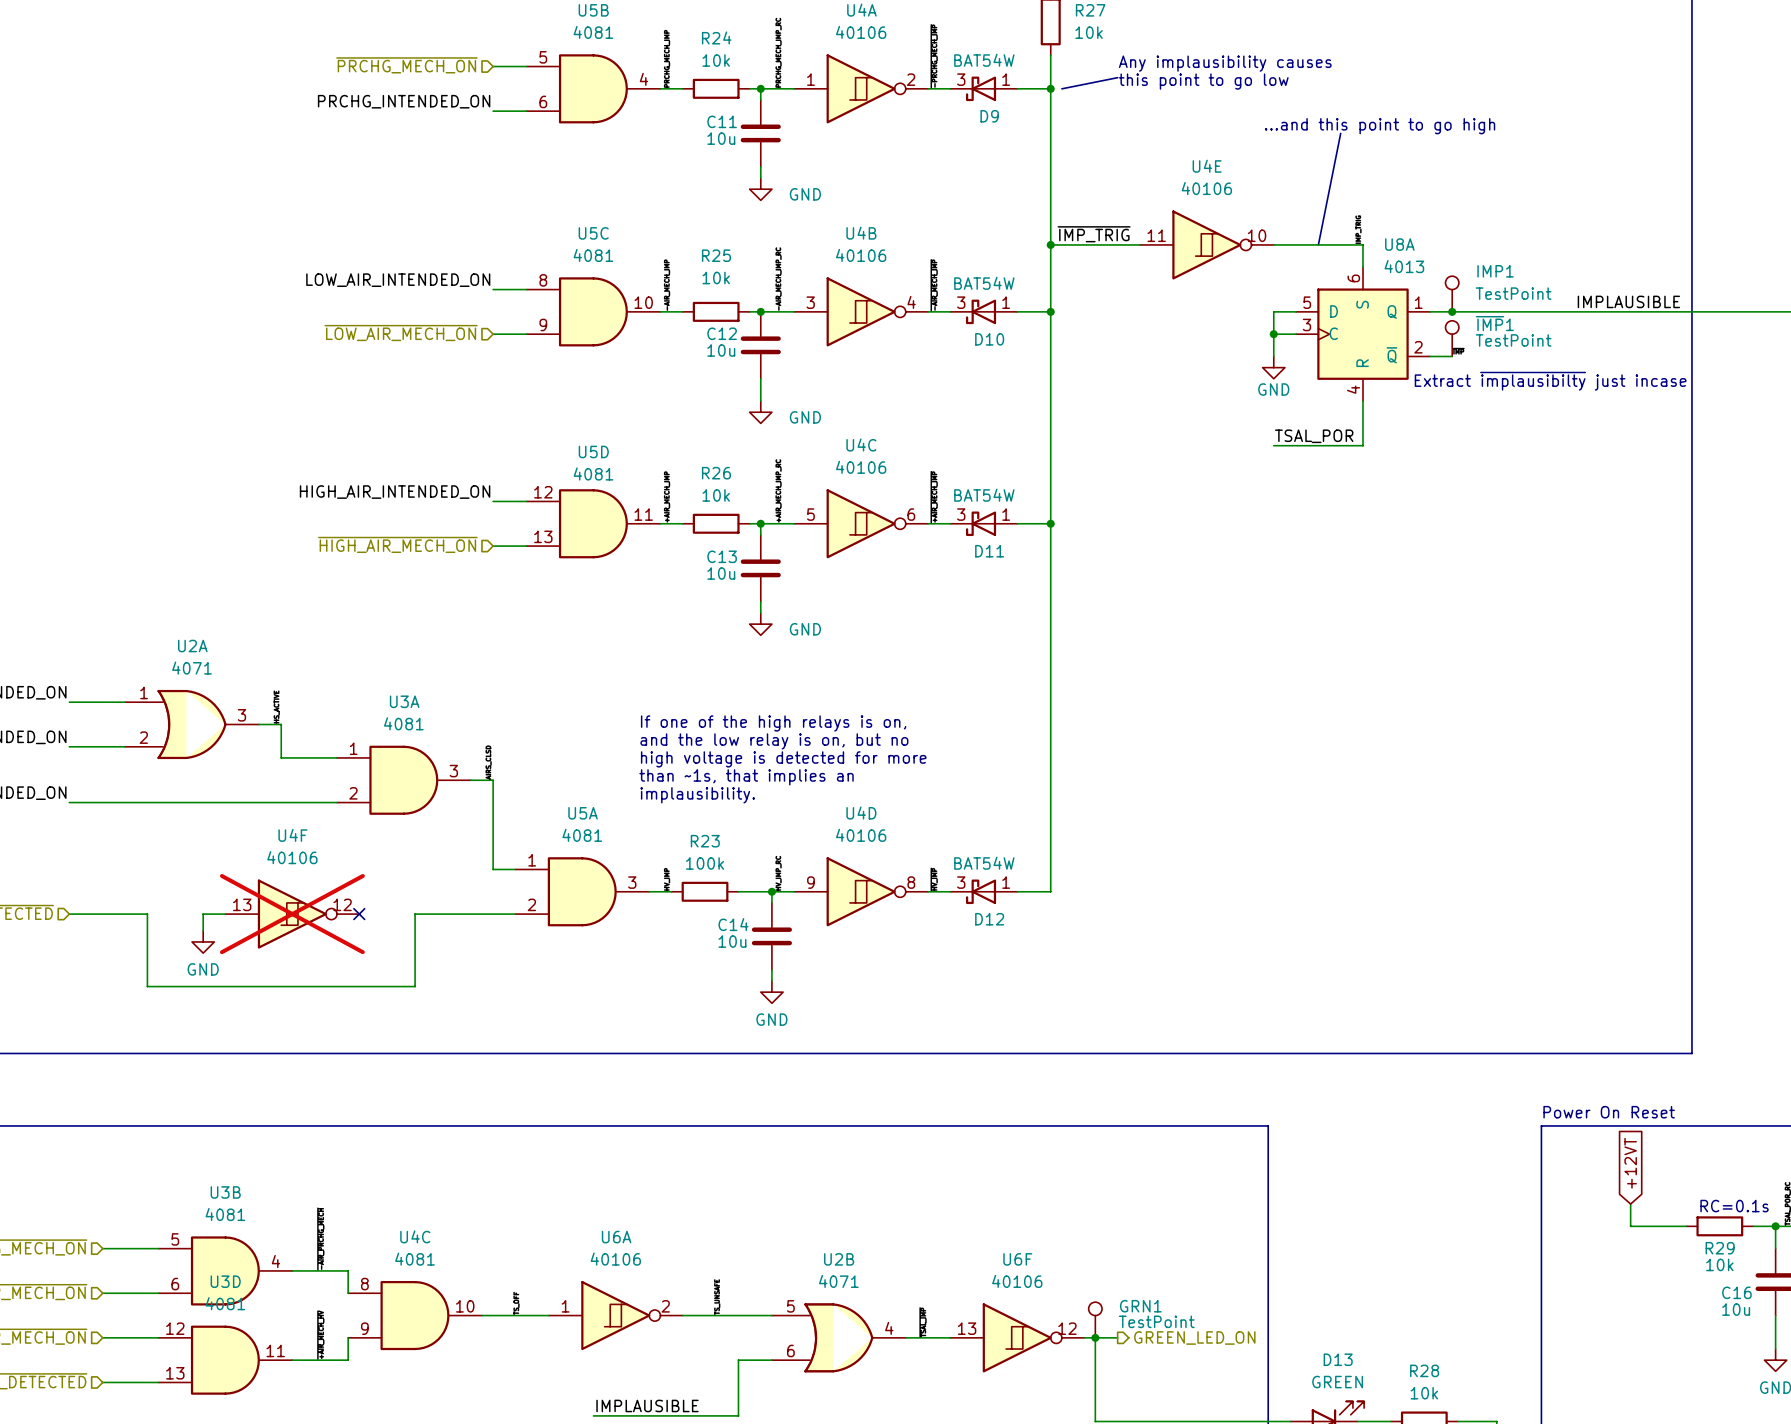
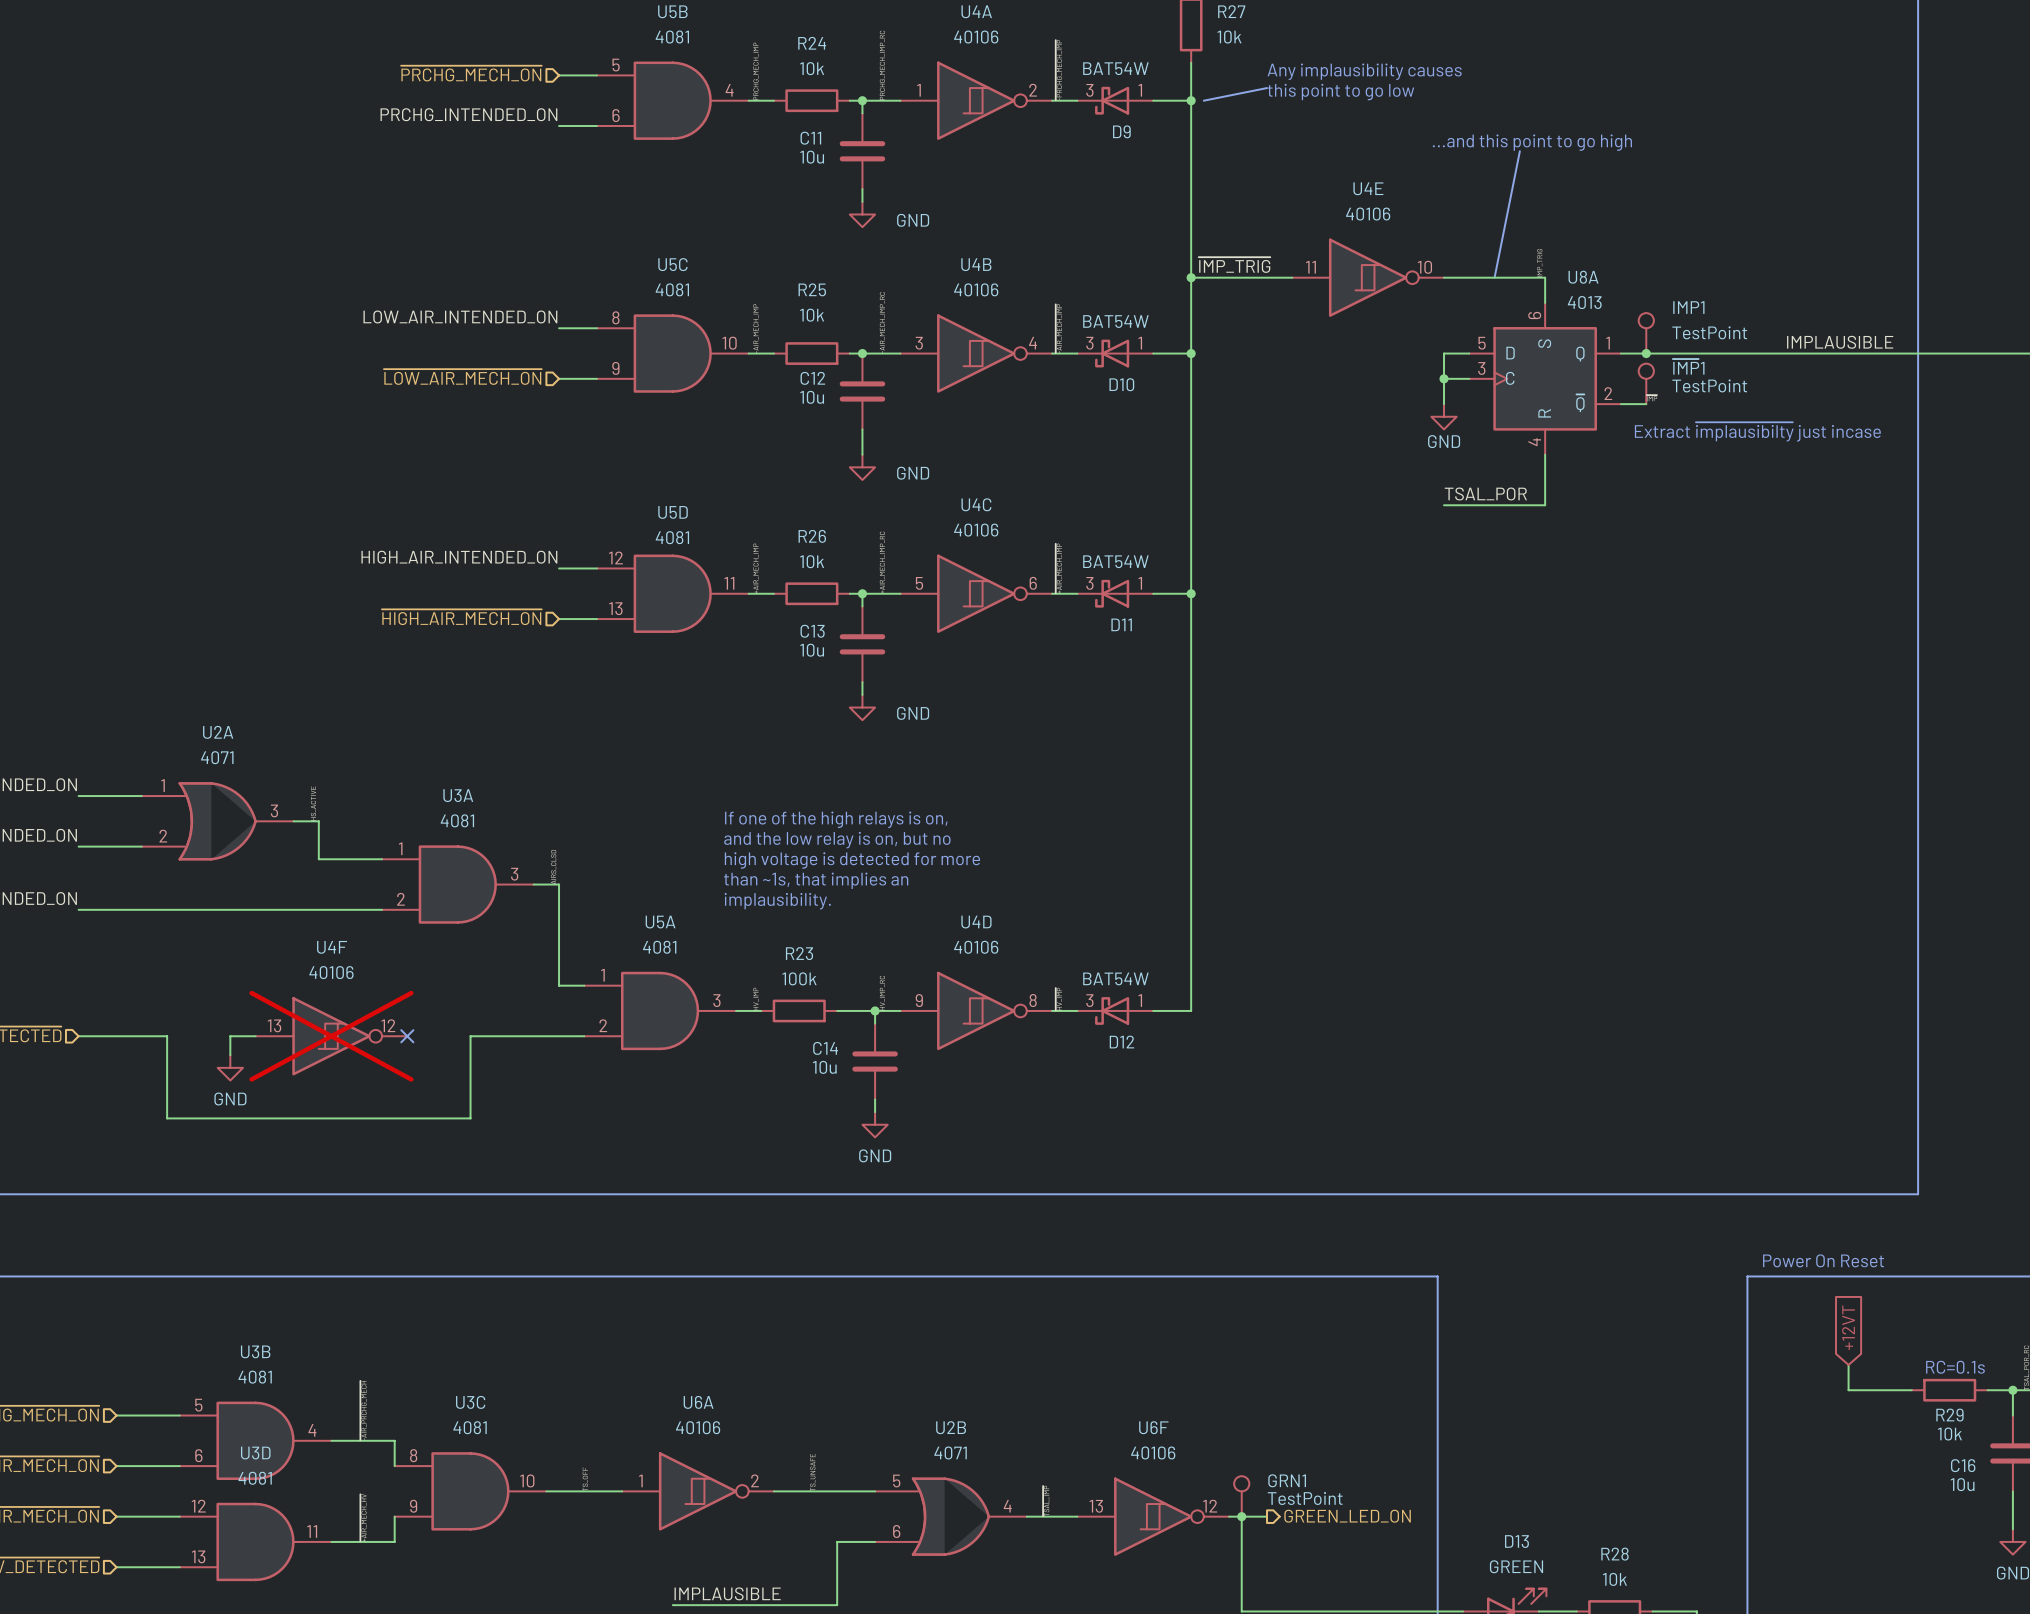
U4C name: U4C (415, 1236) -> U3C (470, 1402)

